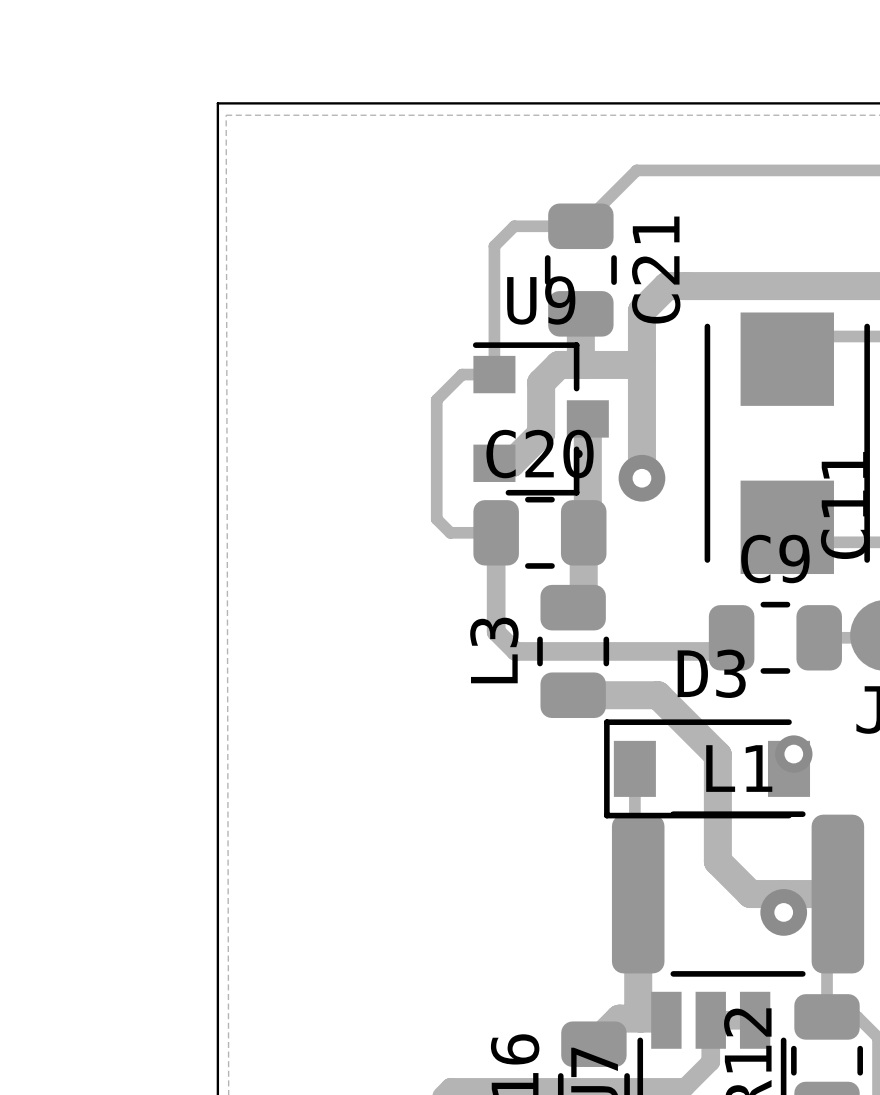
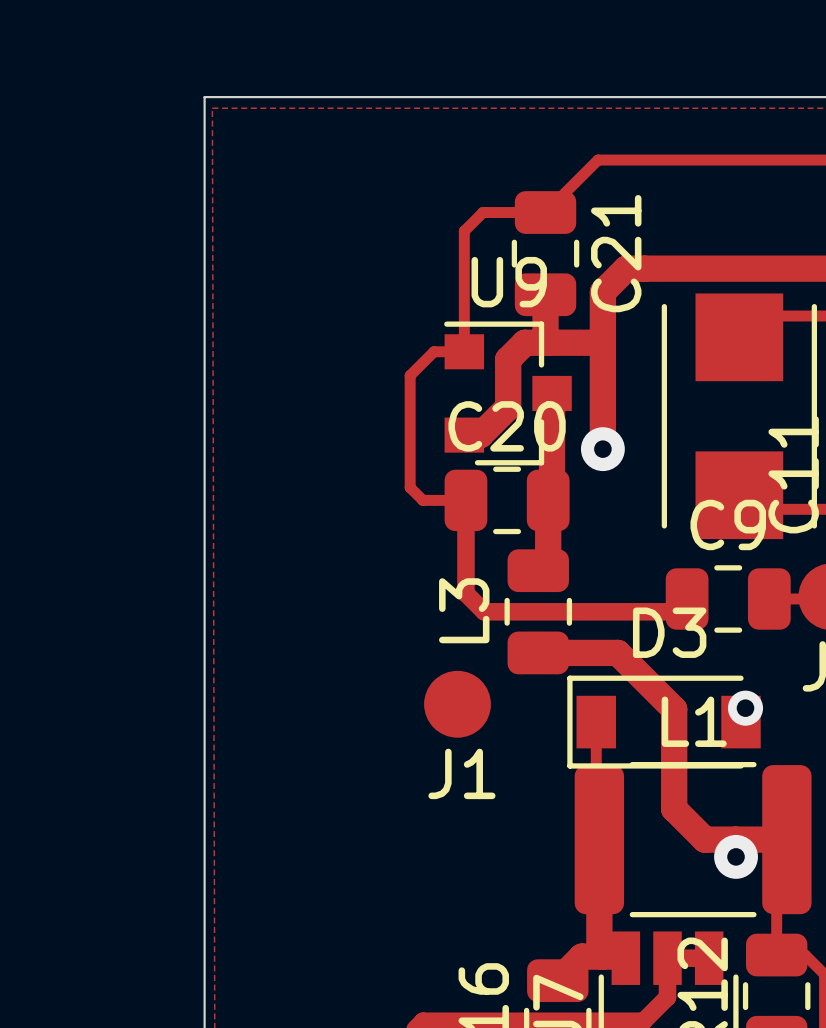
J1: none -> (457, 704)

